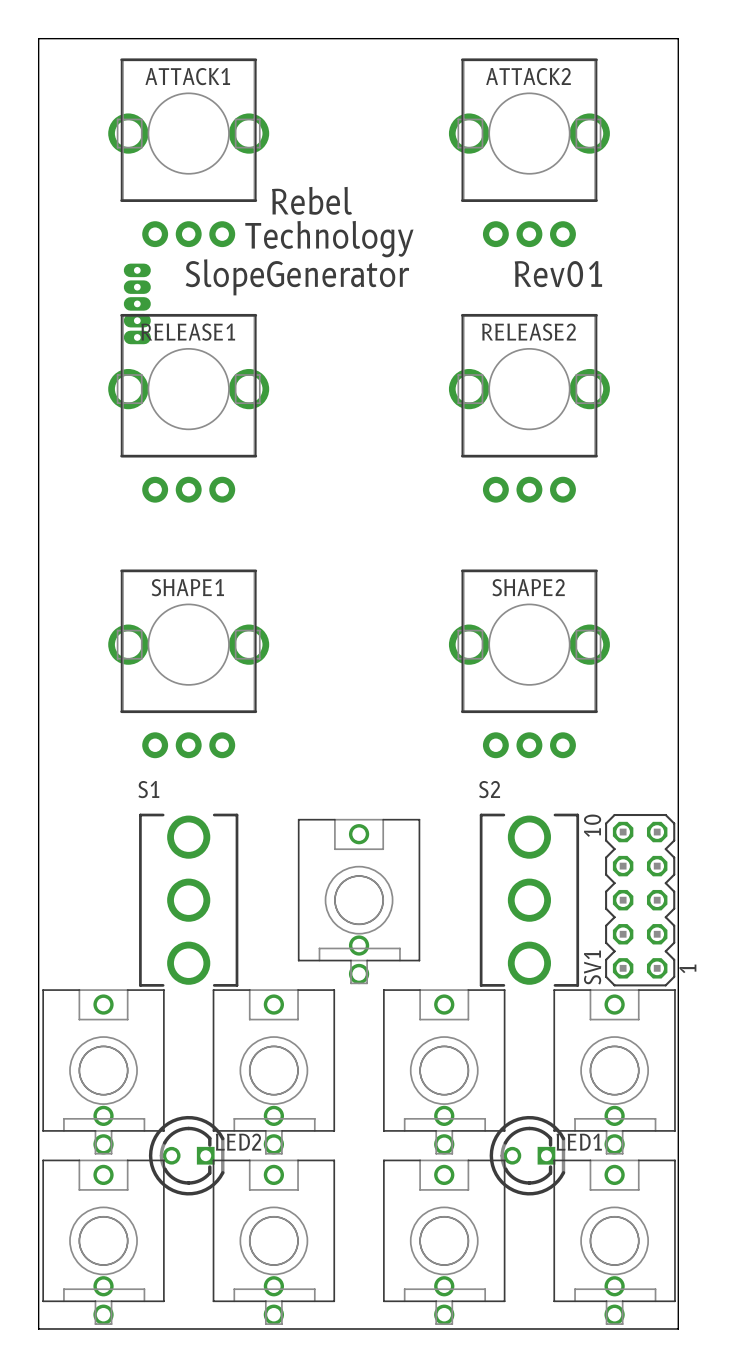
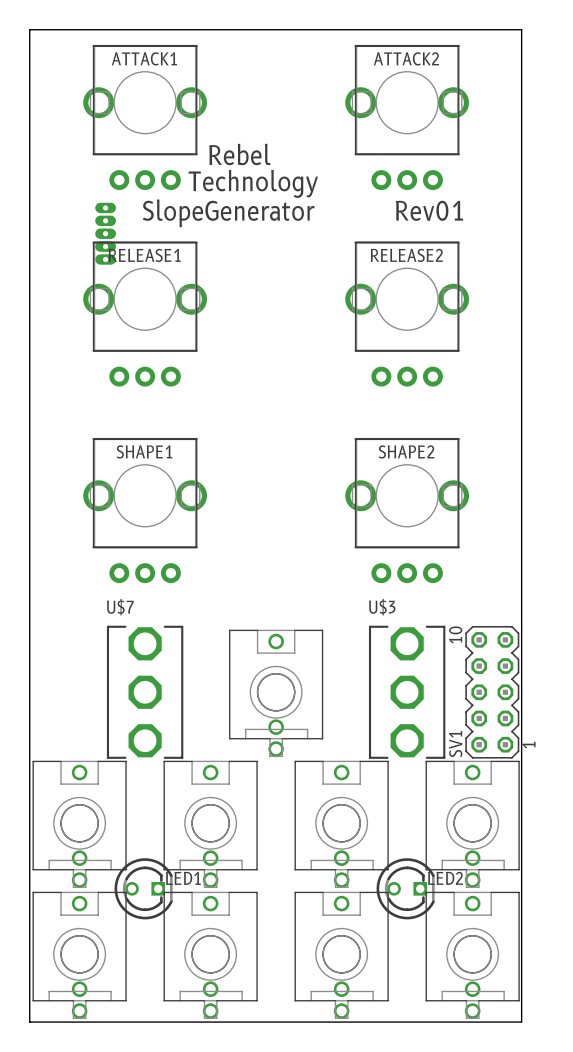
S1: (188, 900) -> none
U$7: none -> (145, 692)
S2: (529, 900) -> none
U$3: none -> (407, 692)
LED2 name: LED2 (238, 1142) -> LED1 (183, 878)
LED1 name: LED1 (579, 1142) -> LED2 (445, 878)

